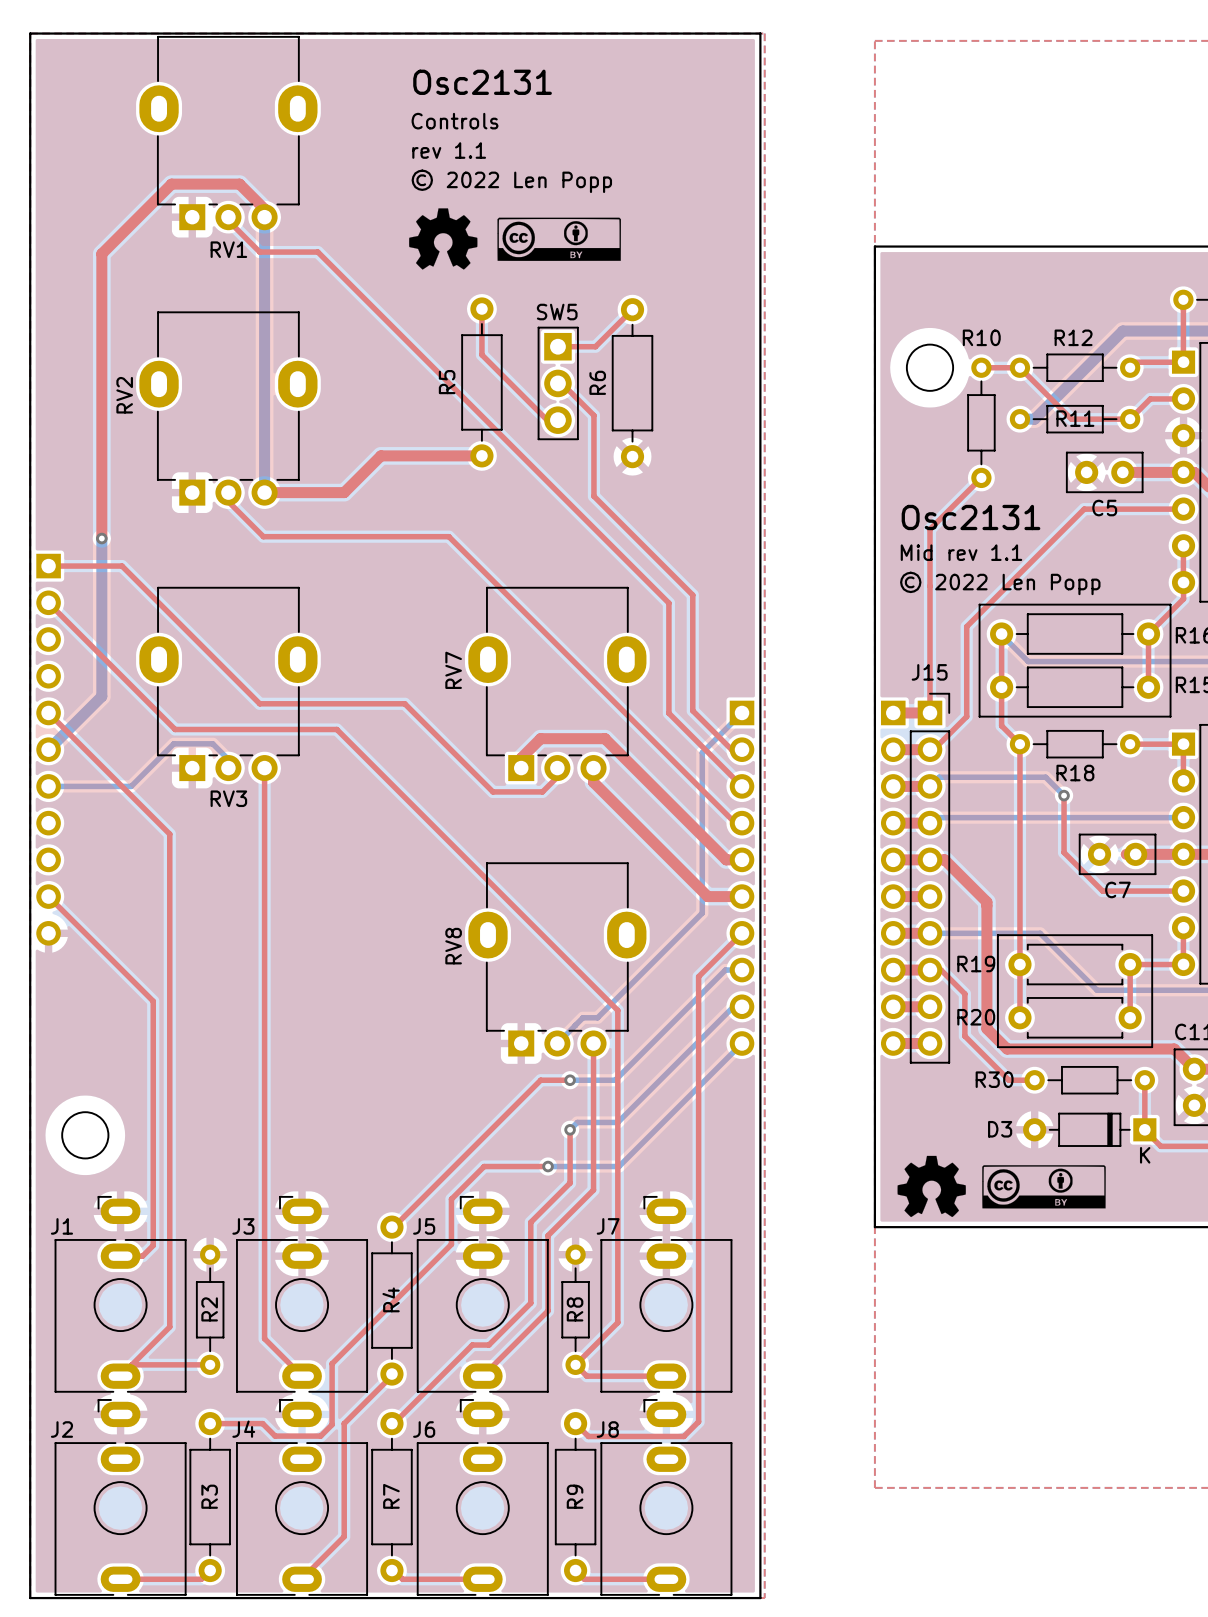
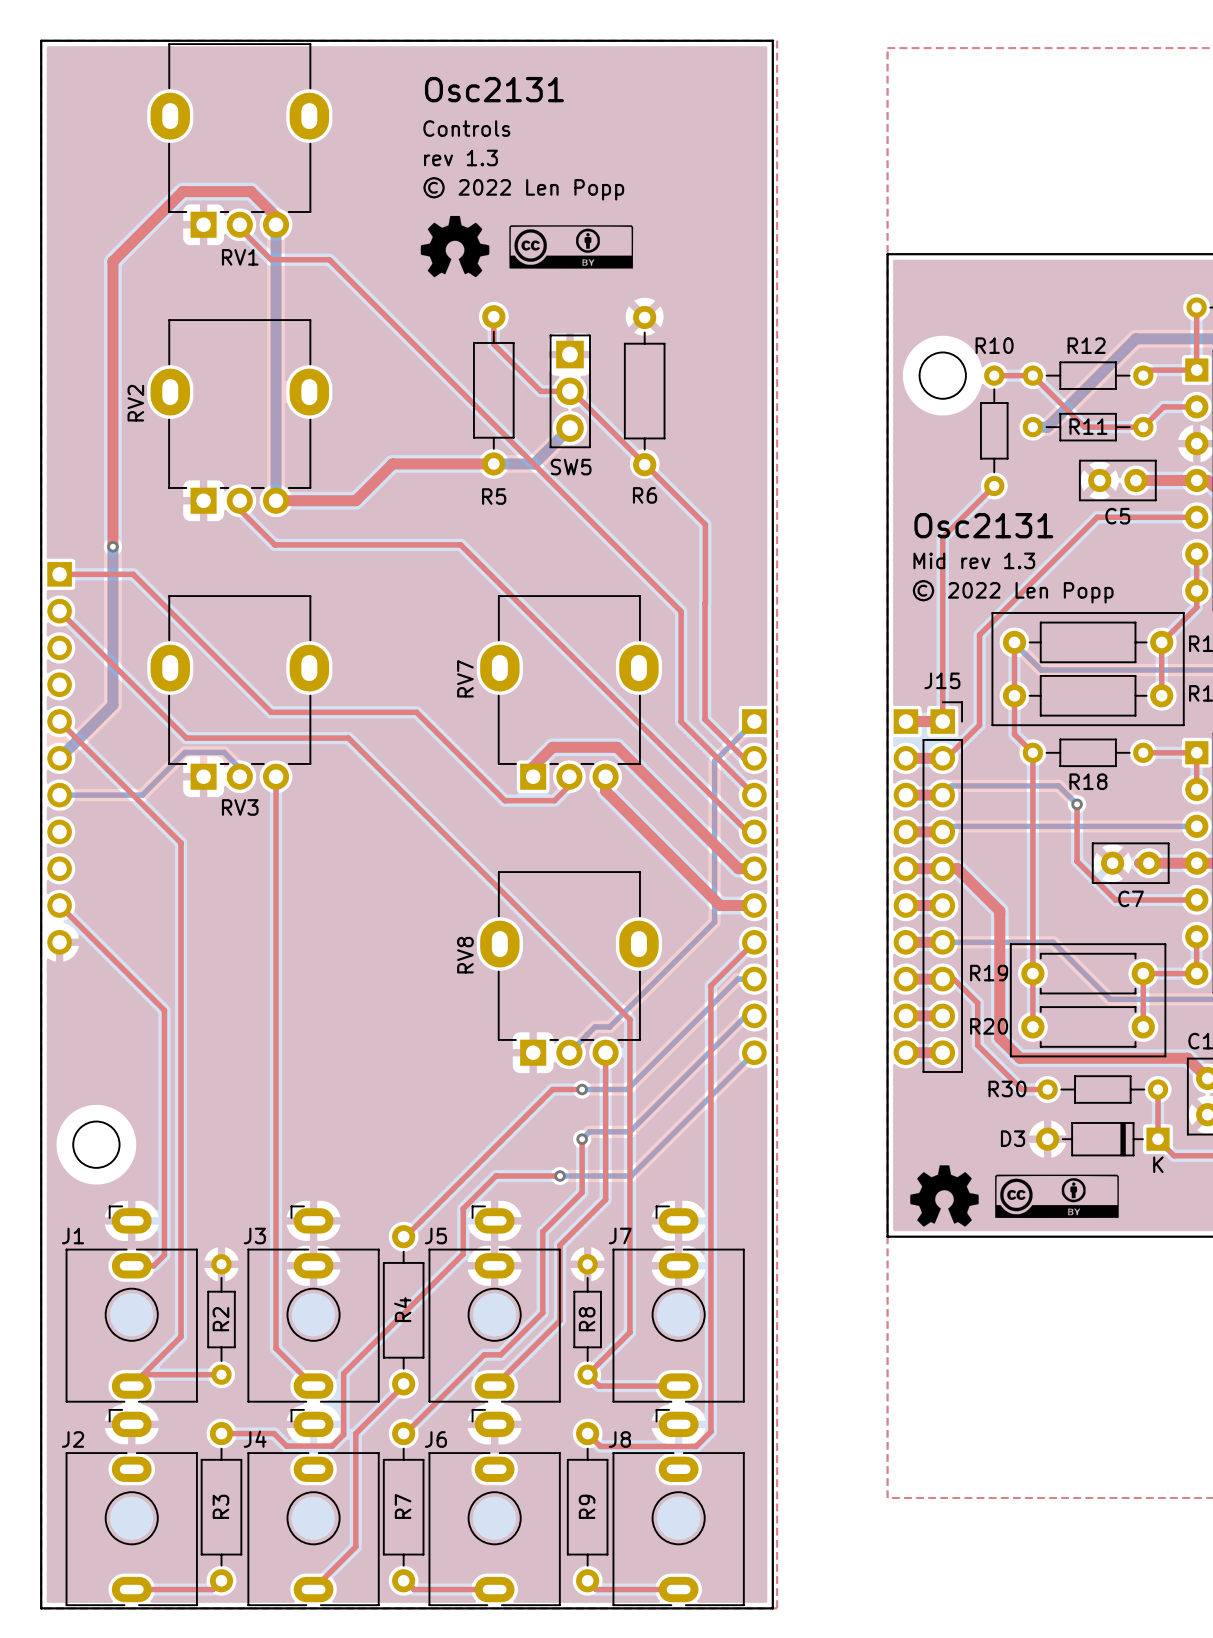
text: rev 1.1 (449, 150) -> rev 1.3 (460, 157)
top track: (632, 309) (595, 346) (557, 346) -> none
SW5 name position: SW5 (557, 312) -> SW5 (571, 467)
top track: (481, 336) (481, 354) (550, 423) -> (493, 344) (540, 391) (569, 391)
R5 name rotation: 0° (447, 382) -> 90° clockwise (494, 496)
R5 name position: R5 (447, 382) -> R5 (494, 496)
R6 name rotation: 0° (597, 382) -> 90° clockwise (645, 495)
R6 name position: R6 (597, 382) -> R6 (645, 495)
top track: (565, 387) (593, 415) (593, 496) (692, 595) -> (577, 395) (705, 524) (705, 603)
bottom track: none -> (569, 428) (534, 463) (493, 463)
text: rev 1.1 (985, 552) -> rev 1.3 (998, 560)

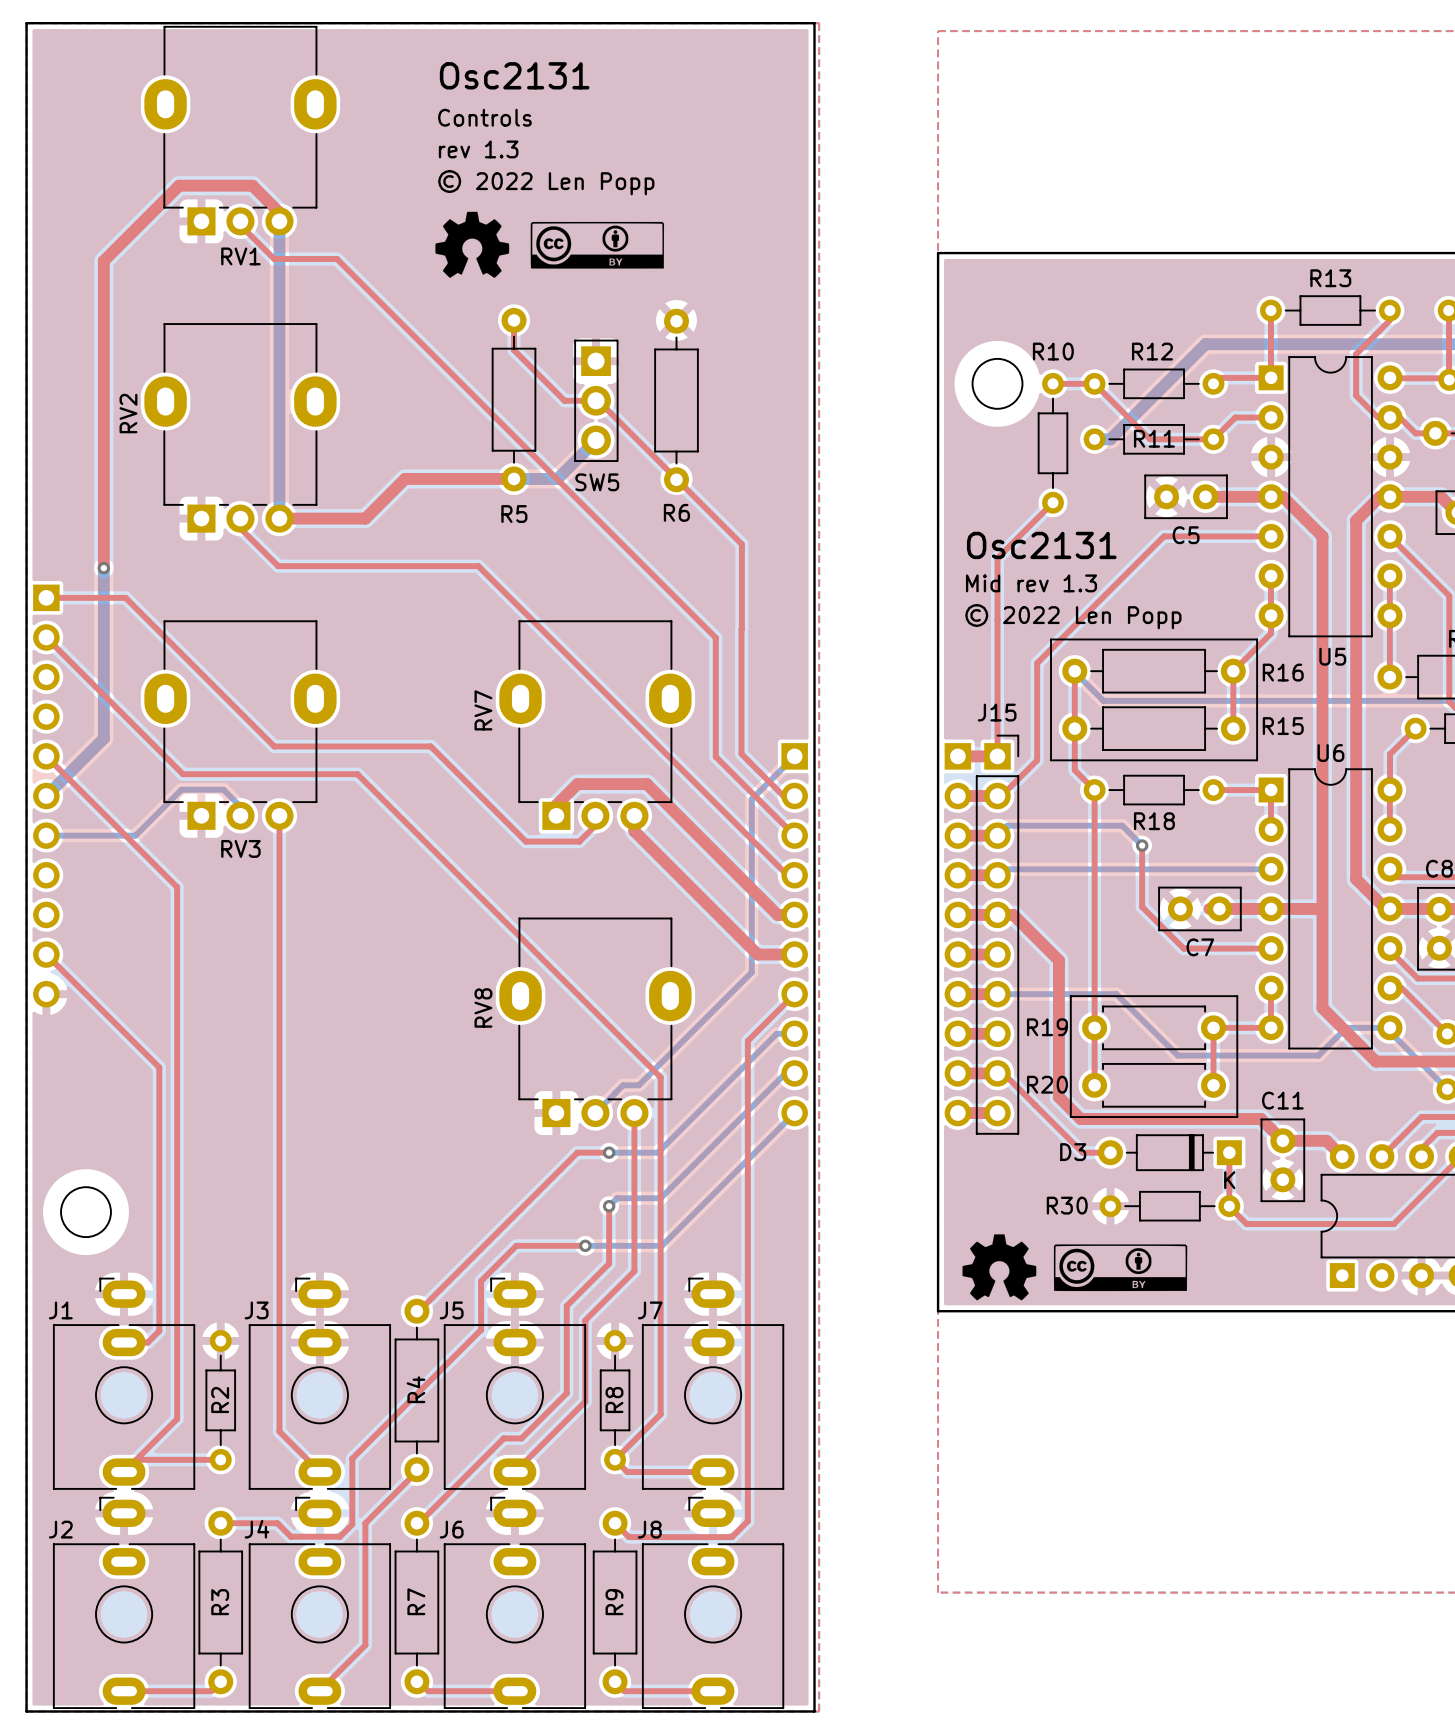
top track: (942, 979) (953, 979) (977, 1003) (977, 1045) -> (997, 1073) (1003, 1073) (1035, 1105)
R30 position: (1102, 1089) -> (1169, 1206)
D3 position: (1102, 1139) -> (1169, 1152)

